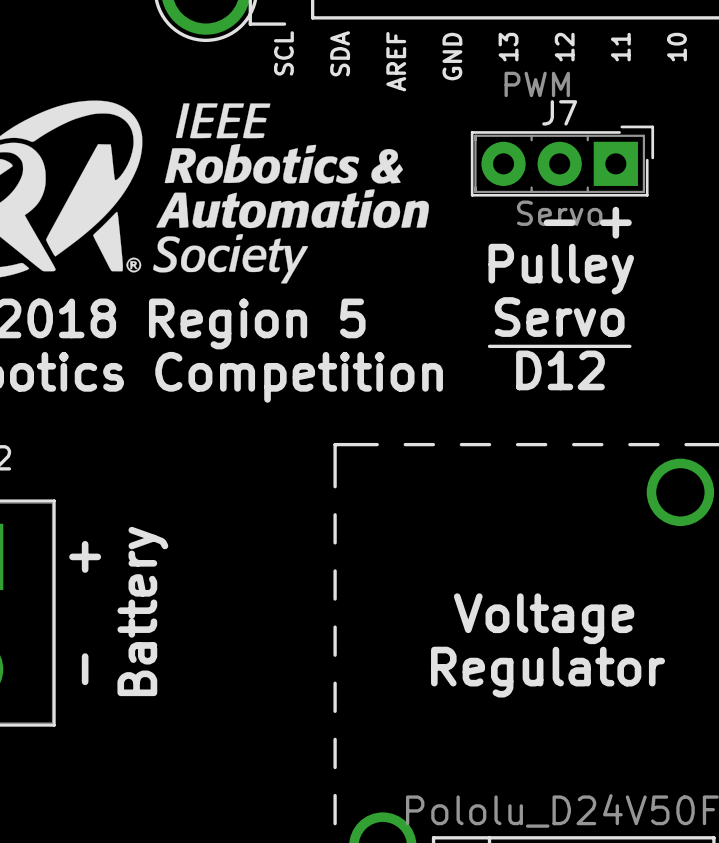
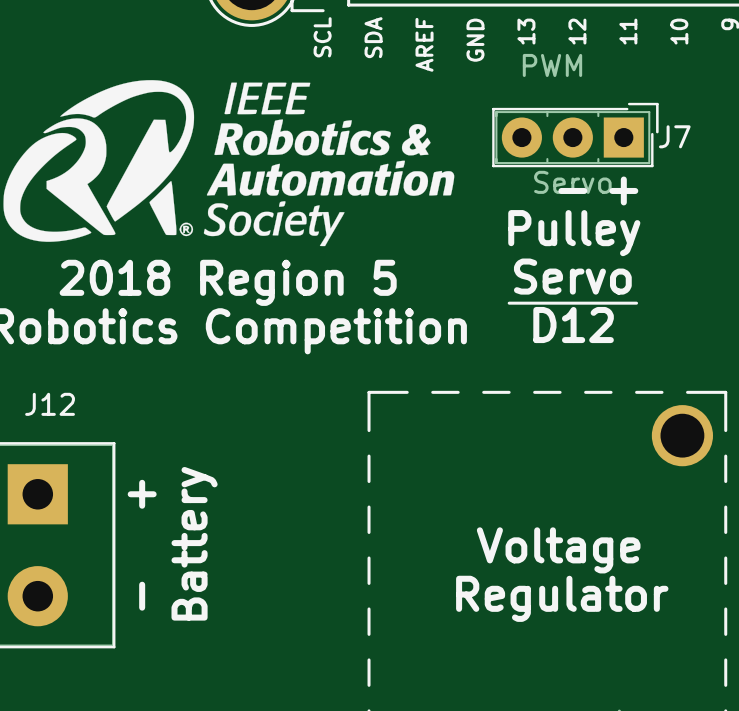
J7 name position: J7 (559, 112) -> J7 (674, 136)

